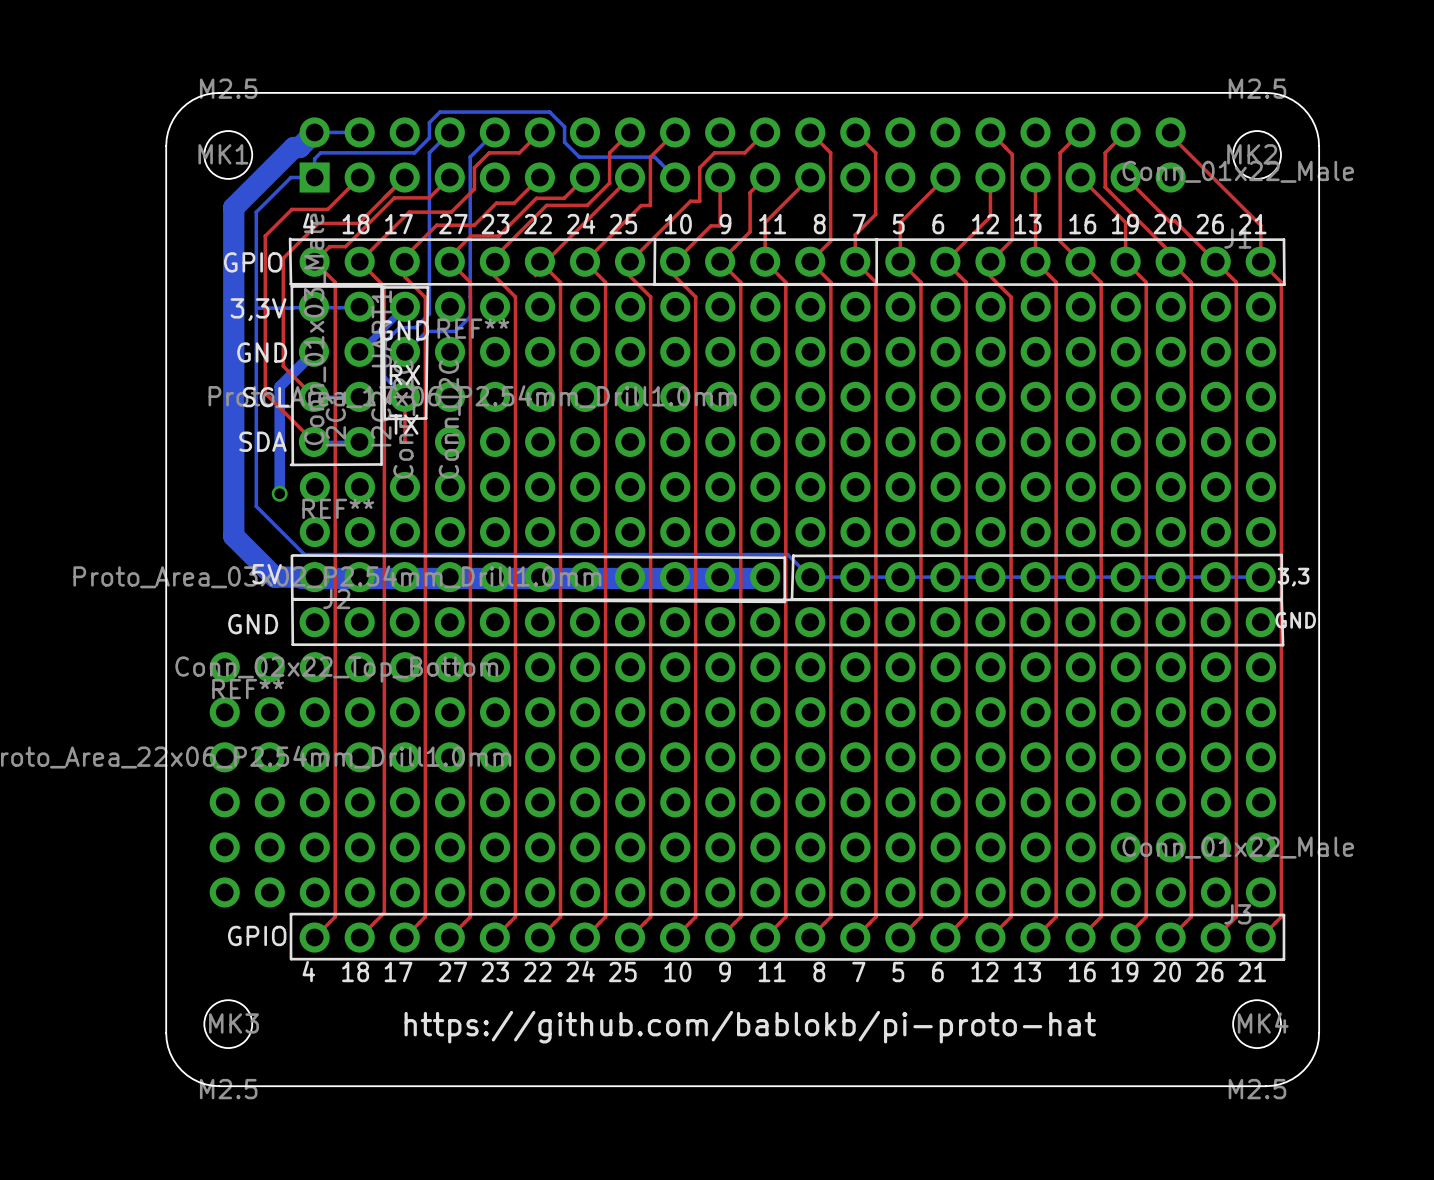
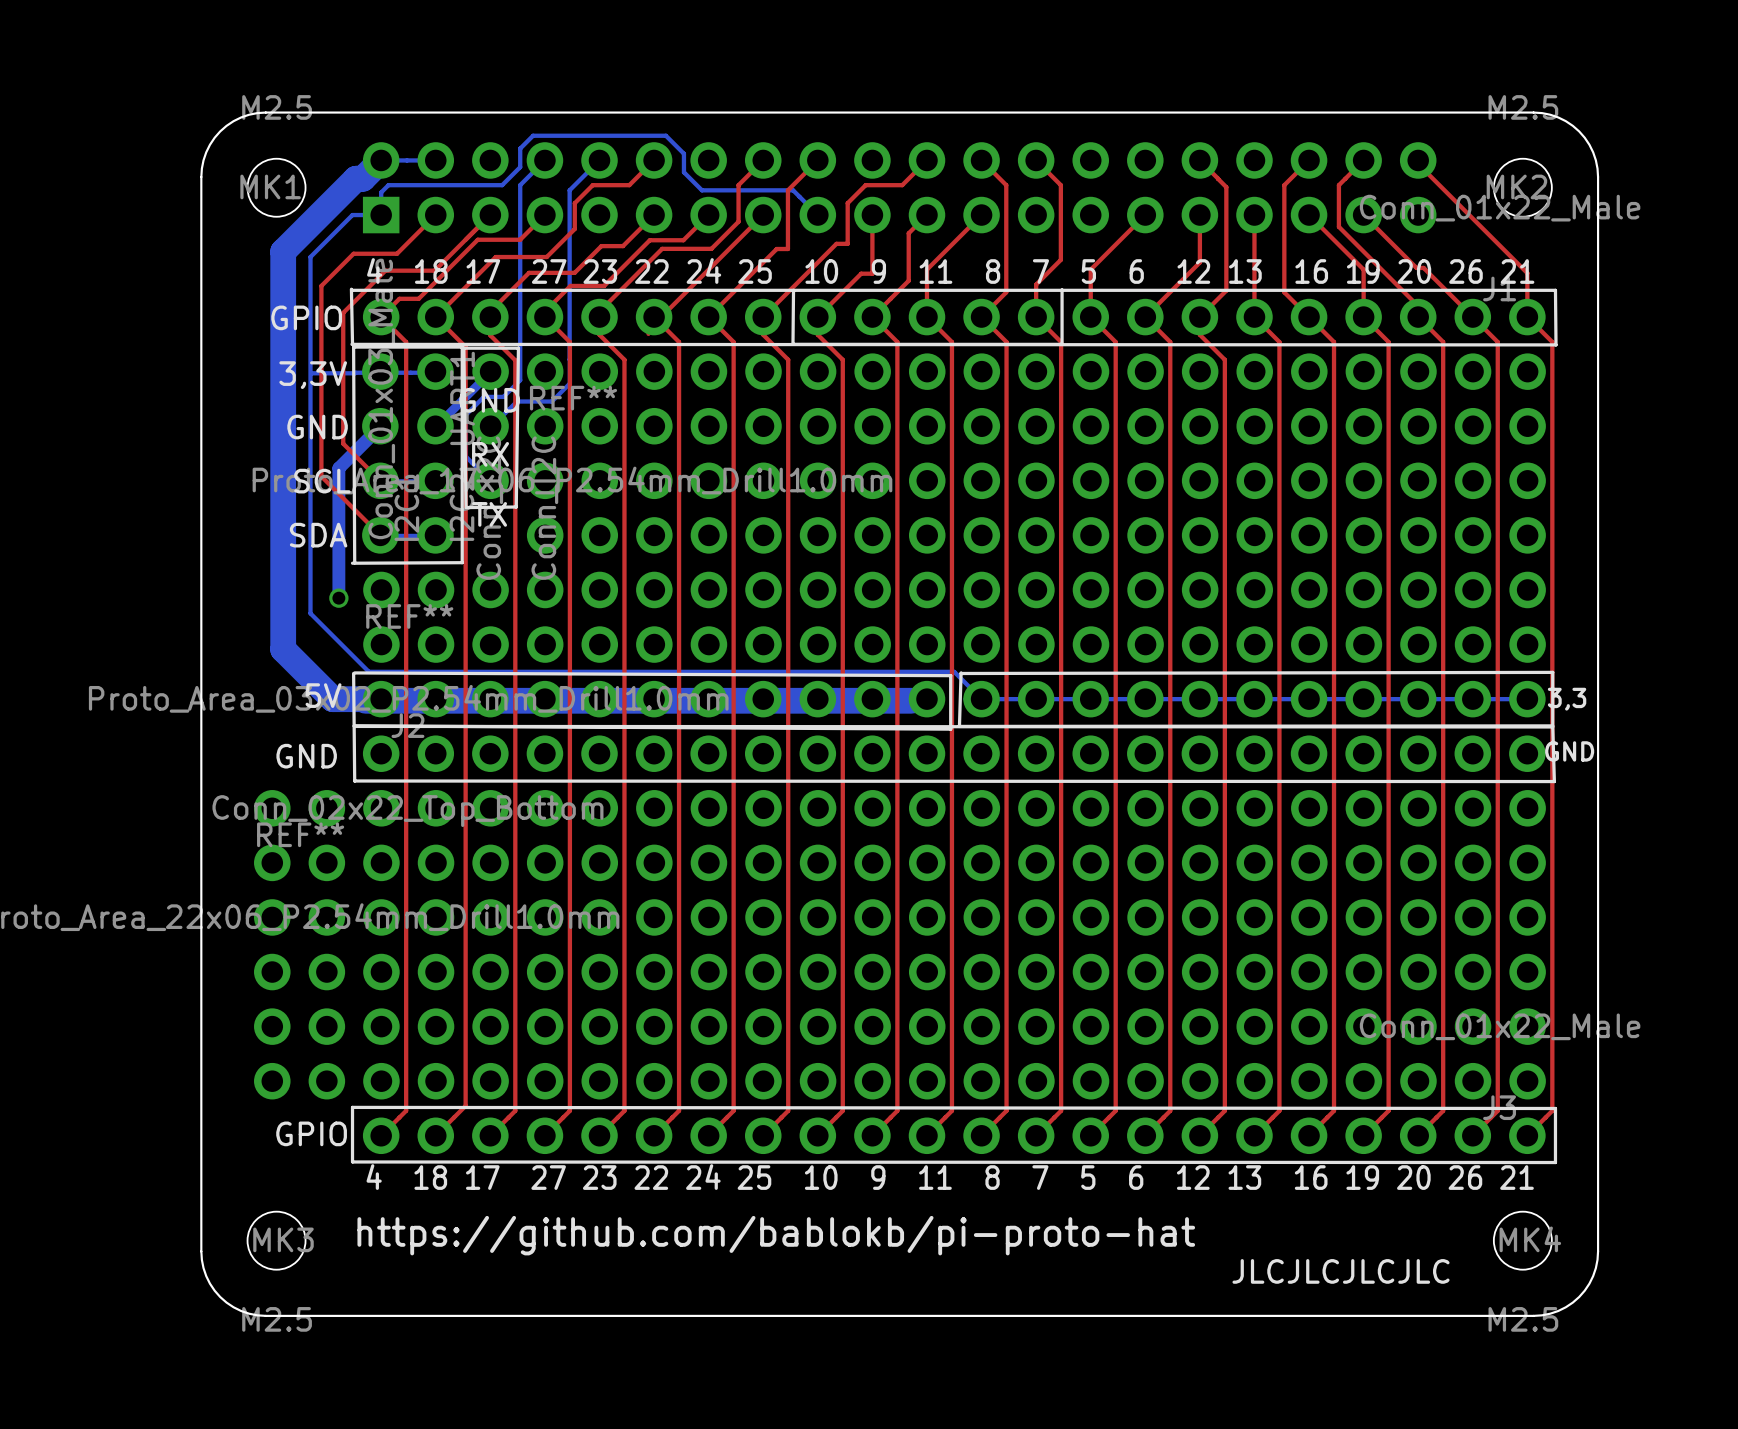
top track: (404, 397) (404, 441) -> none
text position: https://github.com/bablokb/pi-proto-hat (750, 1027) -> https://github.com/bablokb/pi-proto-hat (776, 1235)
text: none -> JLCJLCJLCJLC (1341, 1271)

